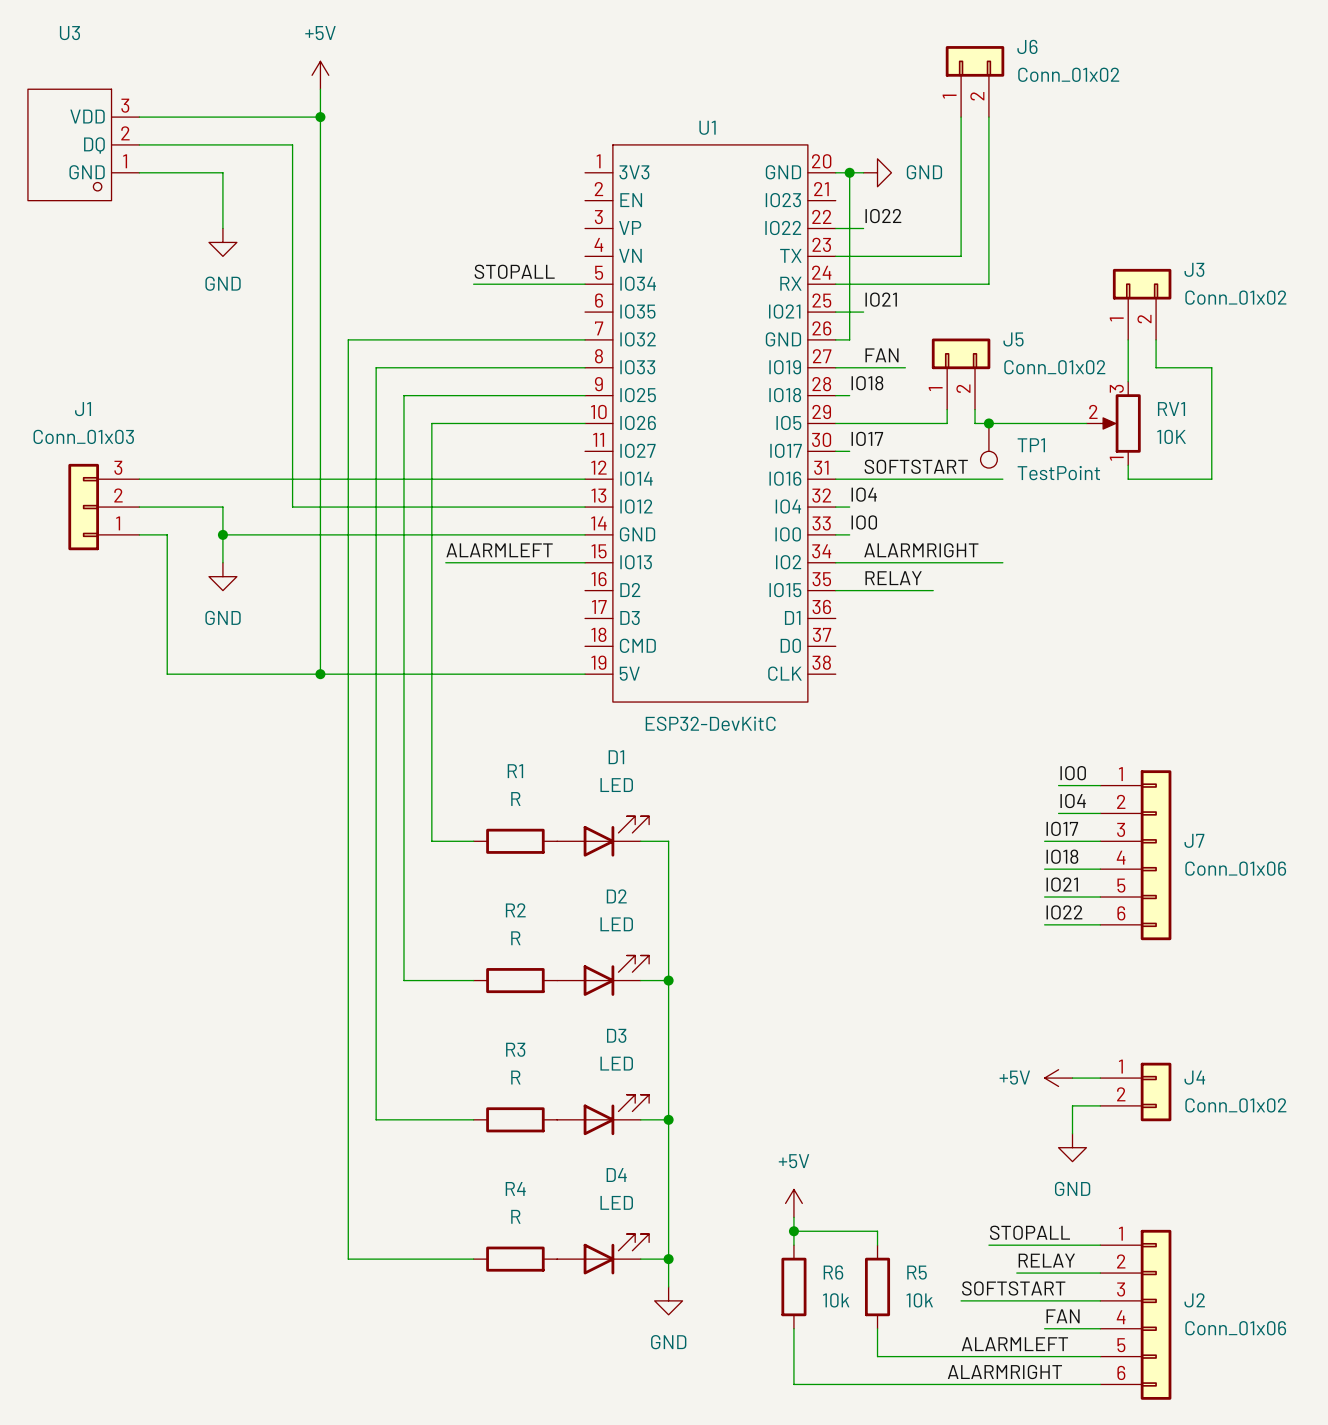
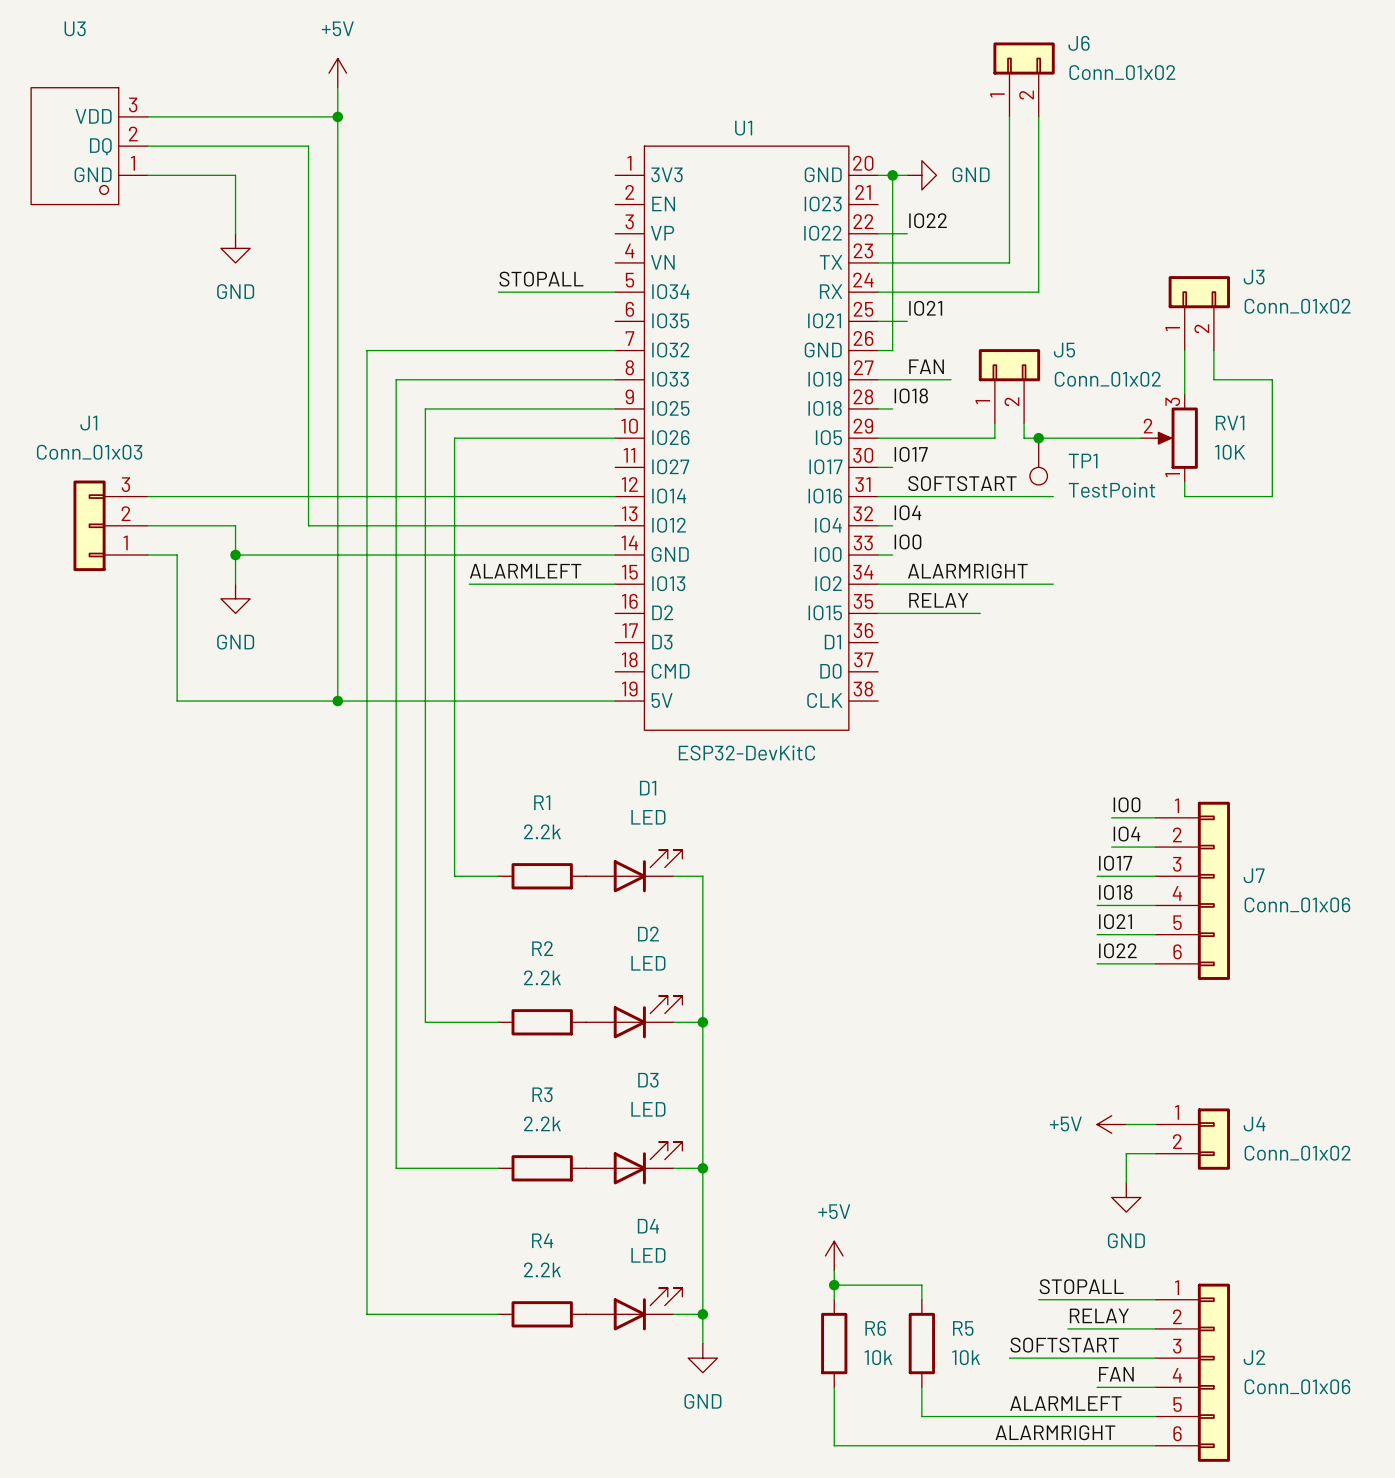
R1 value: R (515, 798) -> 2.2k (542, 831)
R2 value: R (515, 938) -> 2.2k (542, 977)
R3 value: R (515, 1077) -> 2.2k (542, 1123)
R4 value: R (515, 1216) -> 2.2k (542, 1269)

